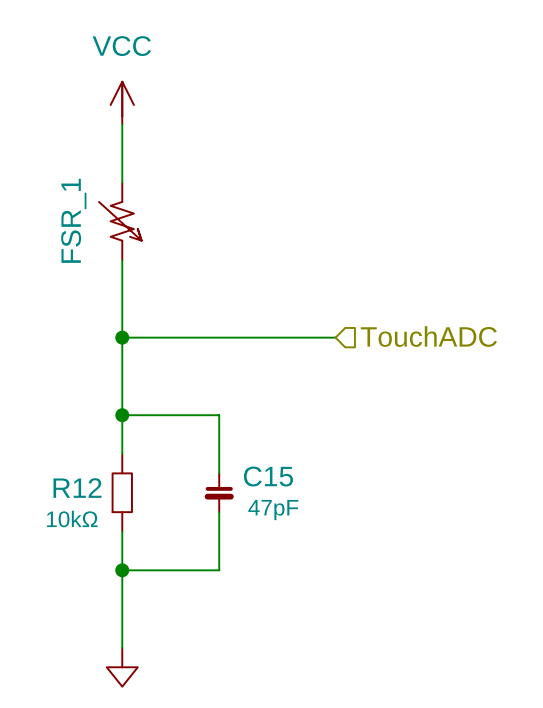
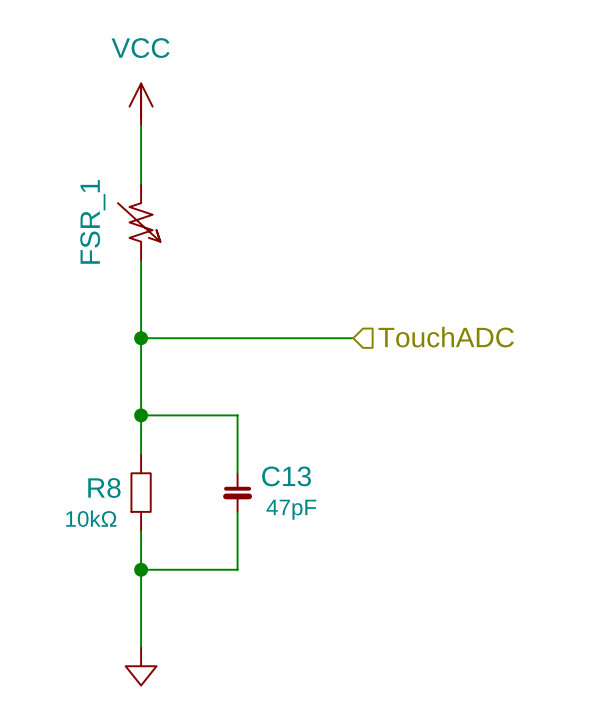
C15 name: C15 (268, 476) -> C13 (286, 476)
R12 name: R12 (77, 488) -> R8 (104, 487)

